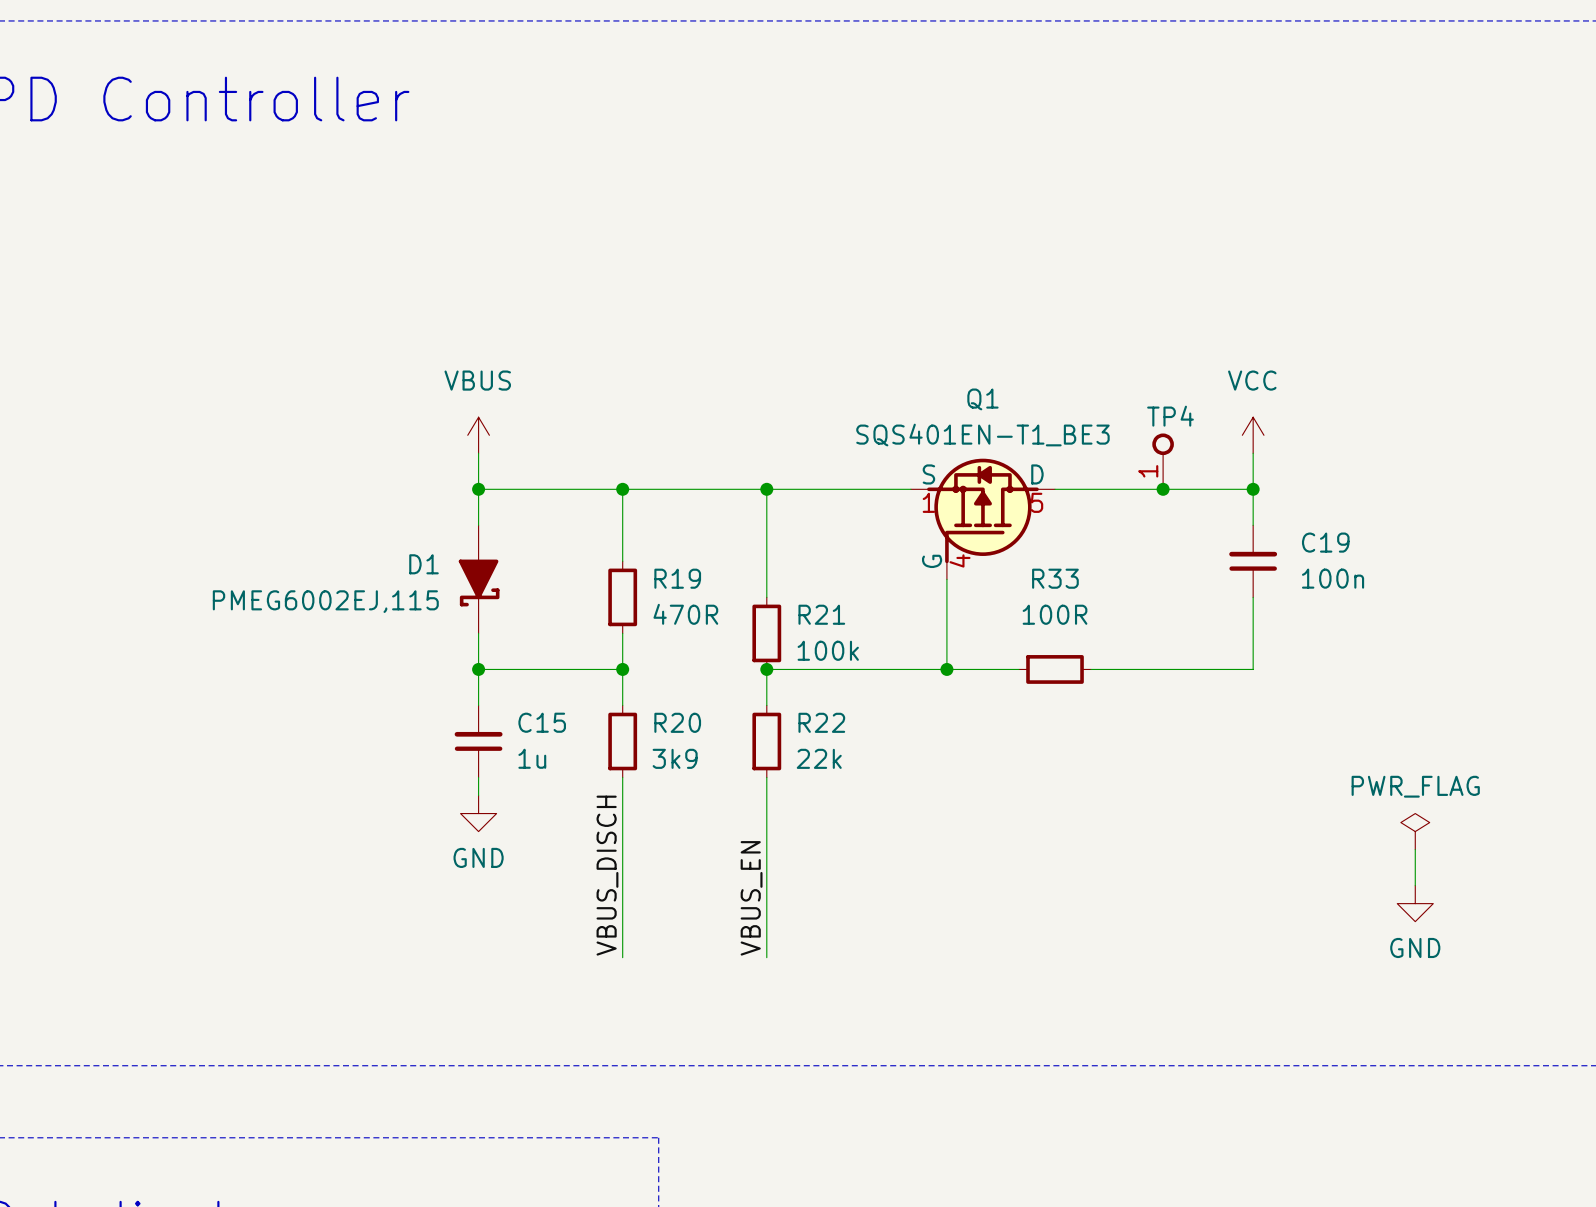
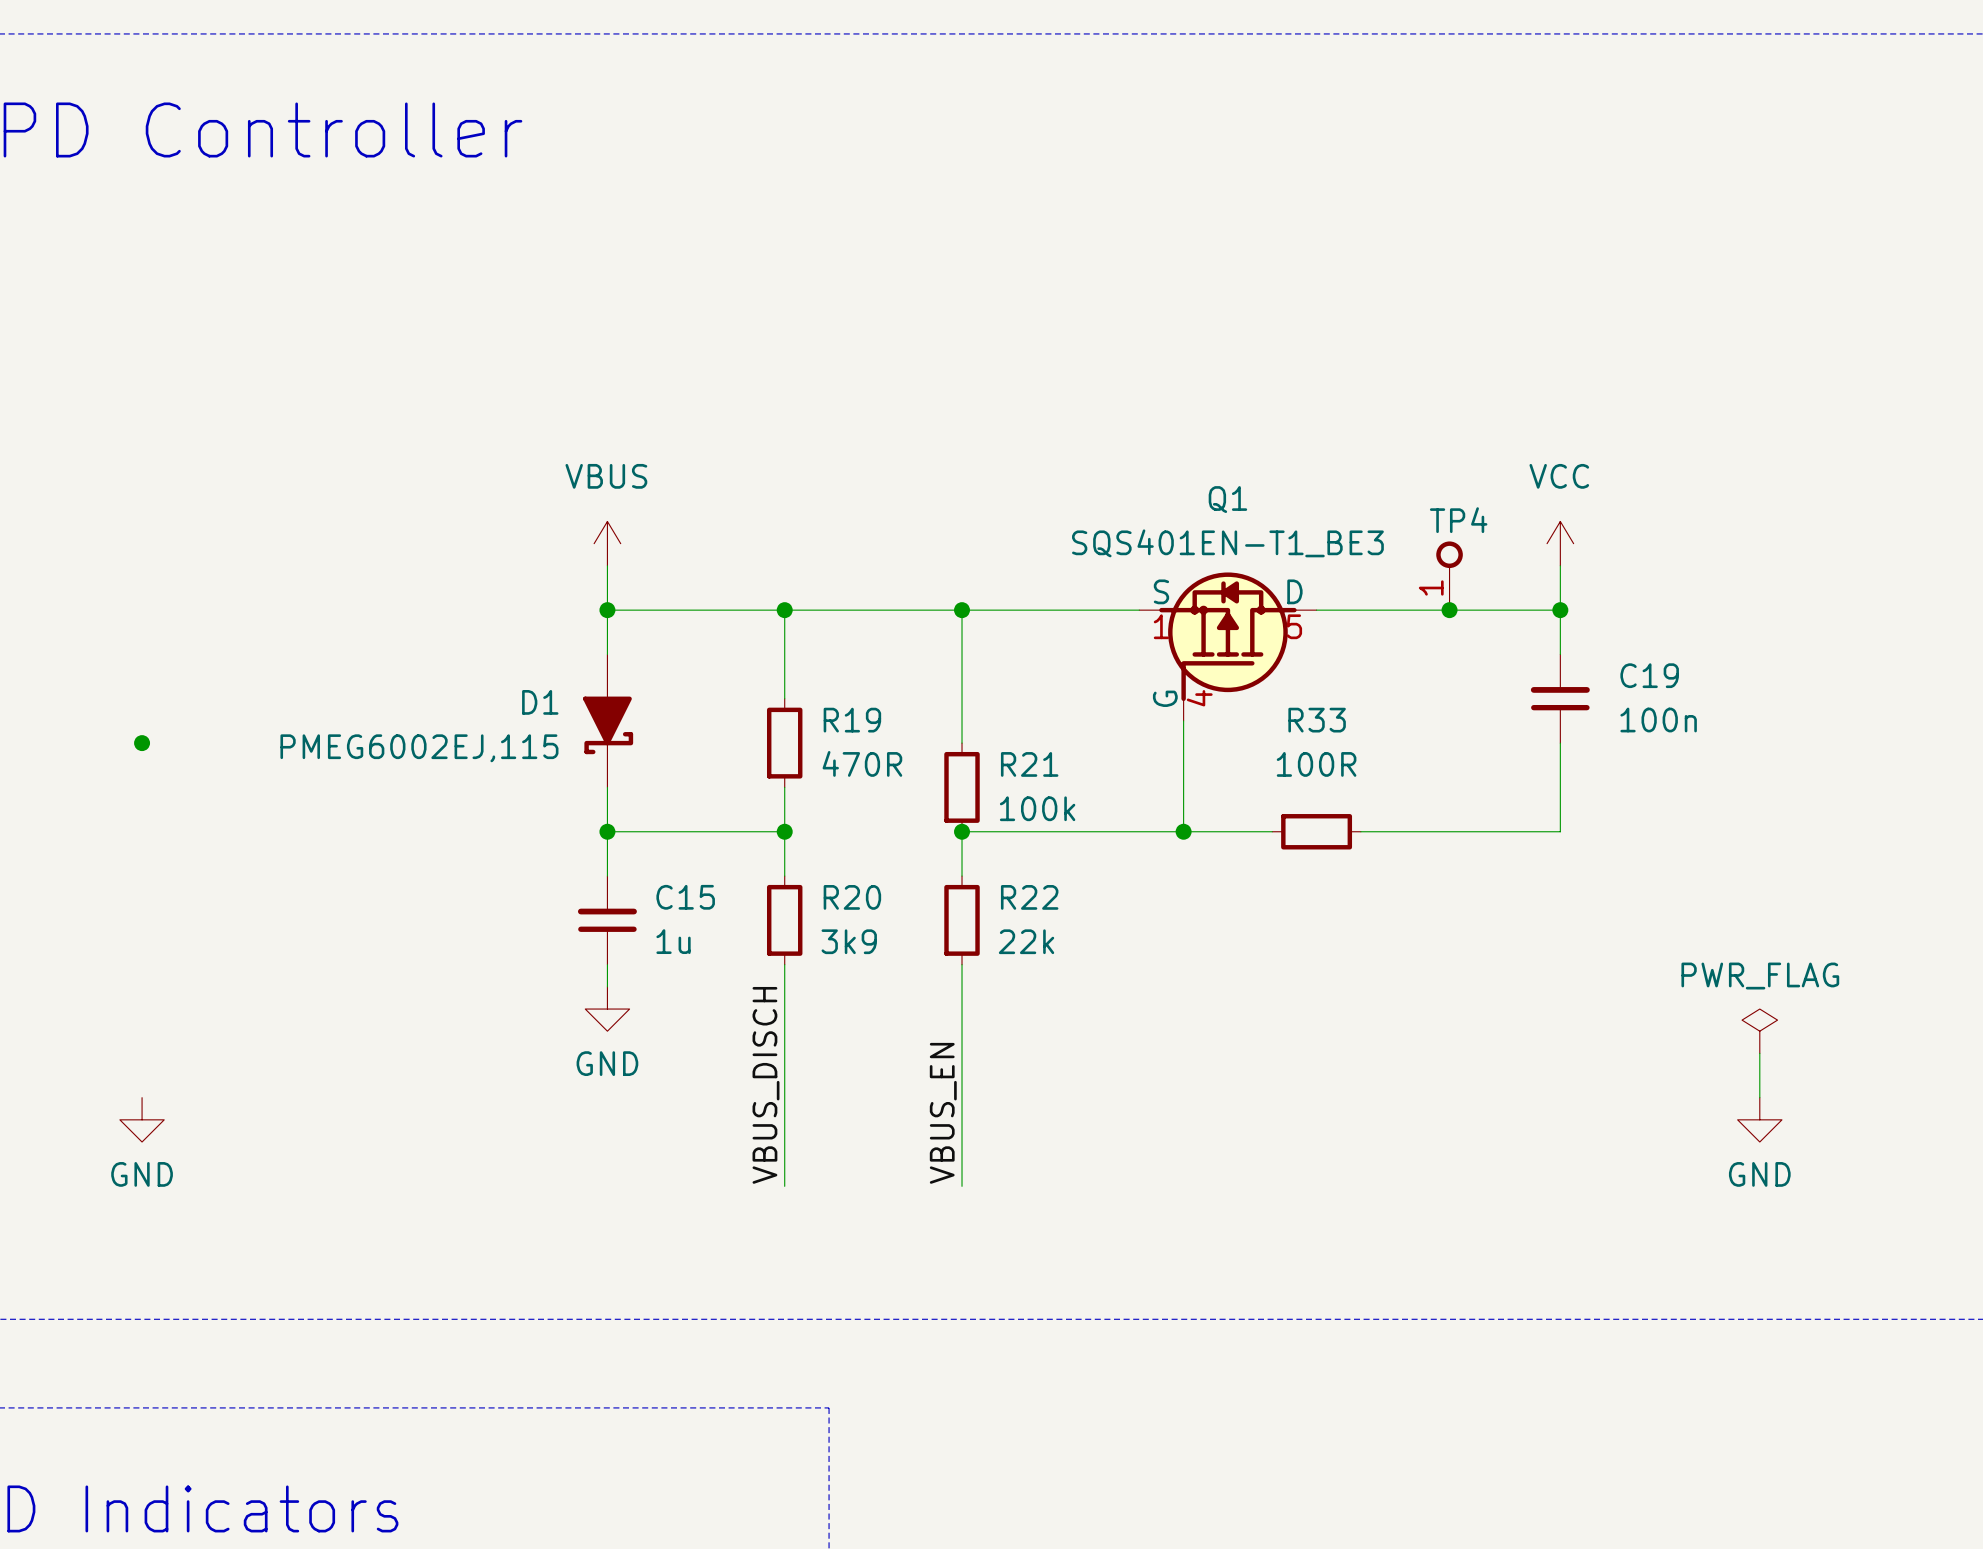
junction: none -> (142, 743)
power symbol: none -> GND (142, 1119)

